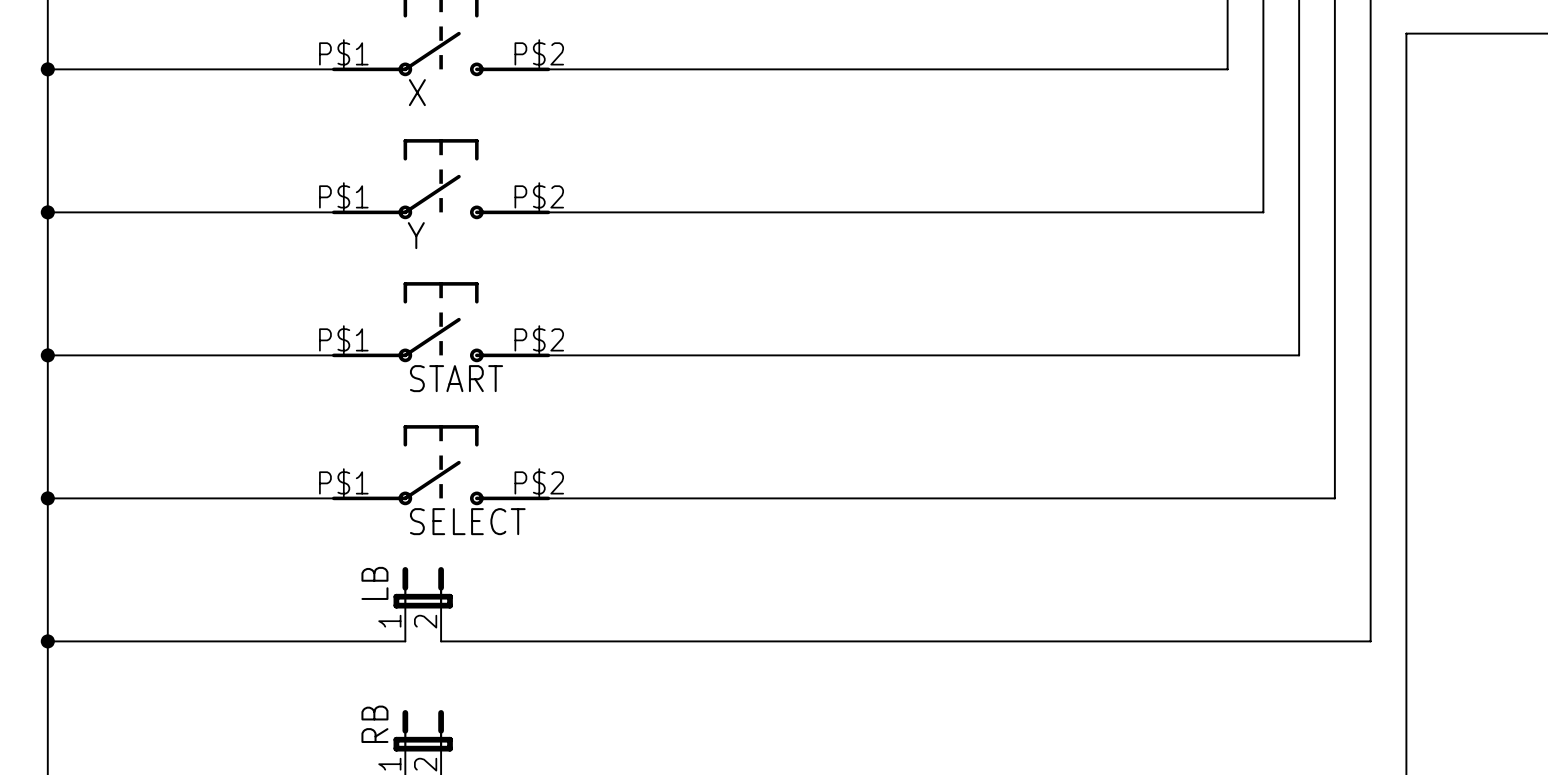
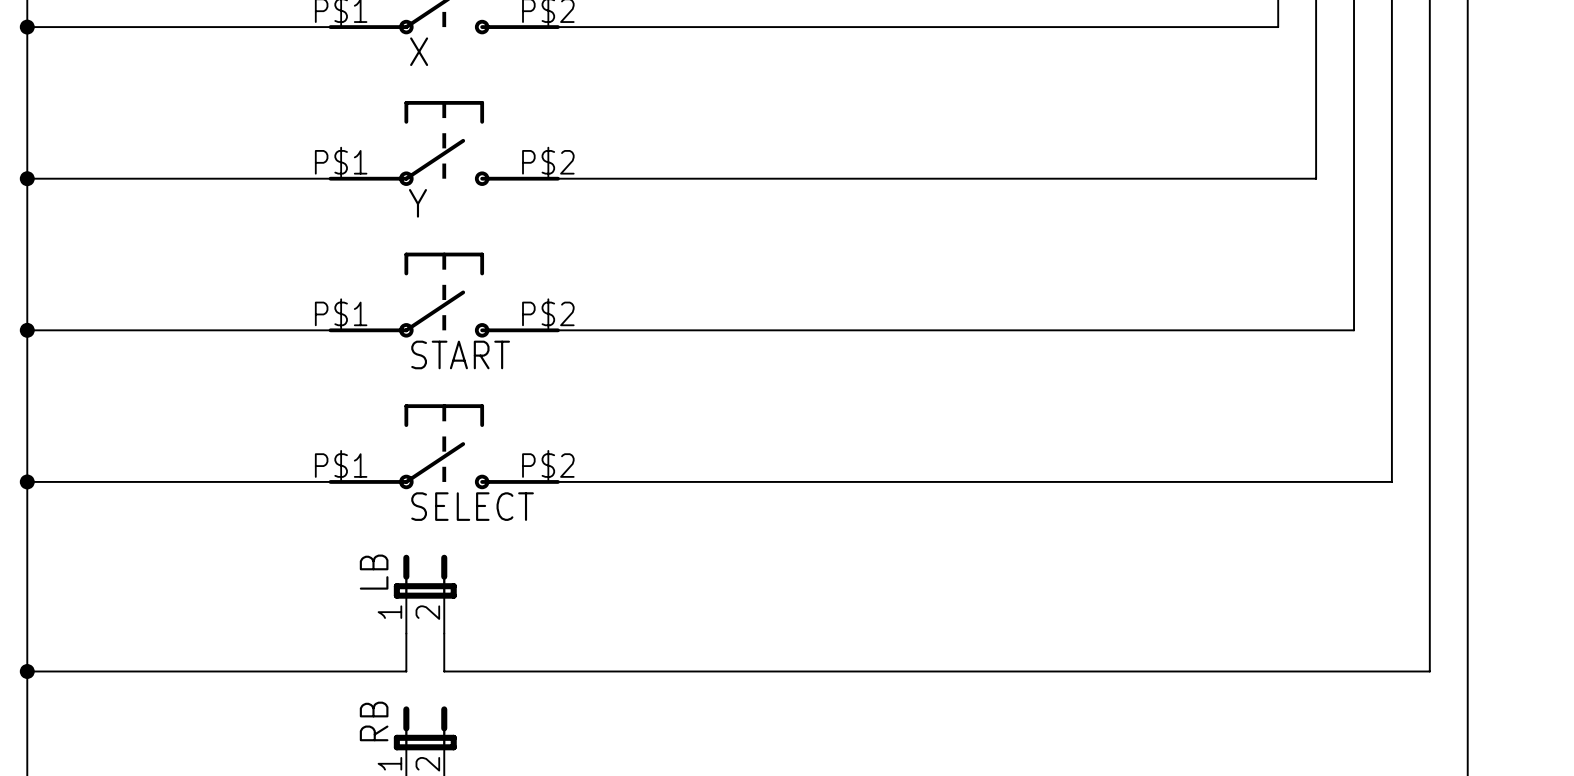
wire: (47, 641) (405, 641) -> (27, 671) (406, 671) (406, 633)
junction position: (47, 641) -> (27, 671)
wire: (441, 641) (1370, 641) -> (444, 633) (444, 671) (1429, 671) (1429, 633)

